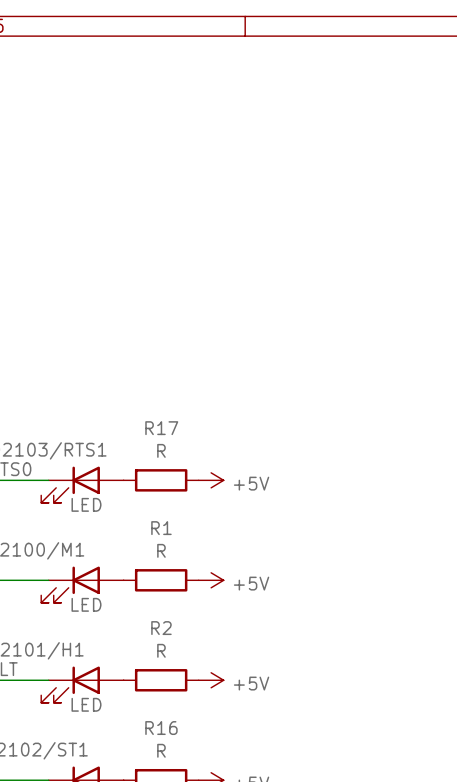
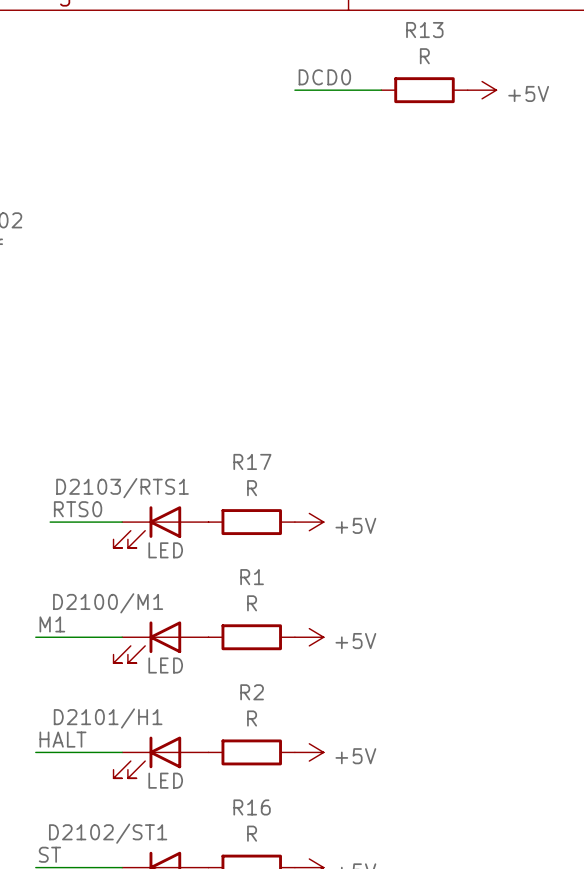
label: none -> DCD0 (324, 77)
wire: none -> (294, 90) (381, 90)
R13: none -> R (424, 90)
power symbol: none -> +5V (482, 90)

